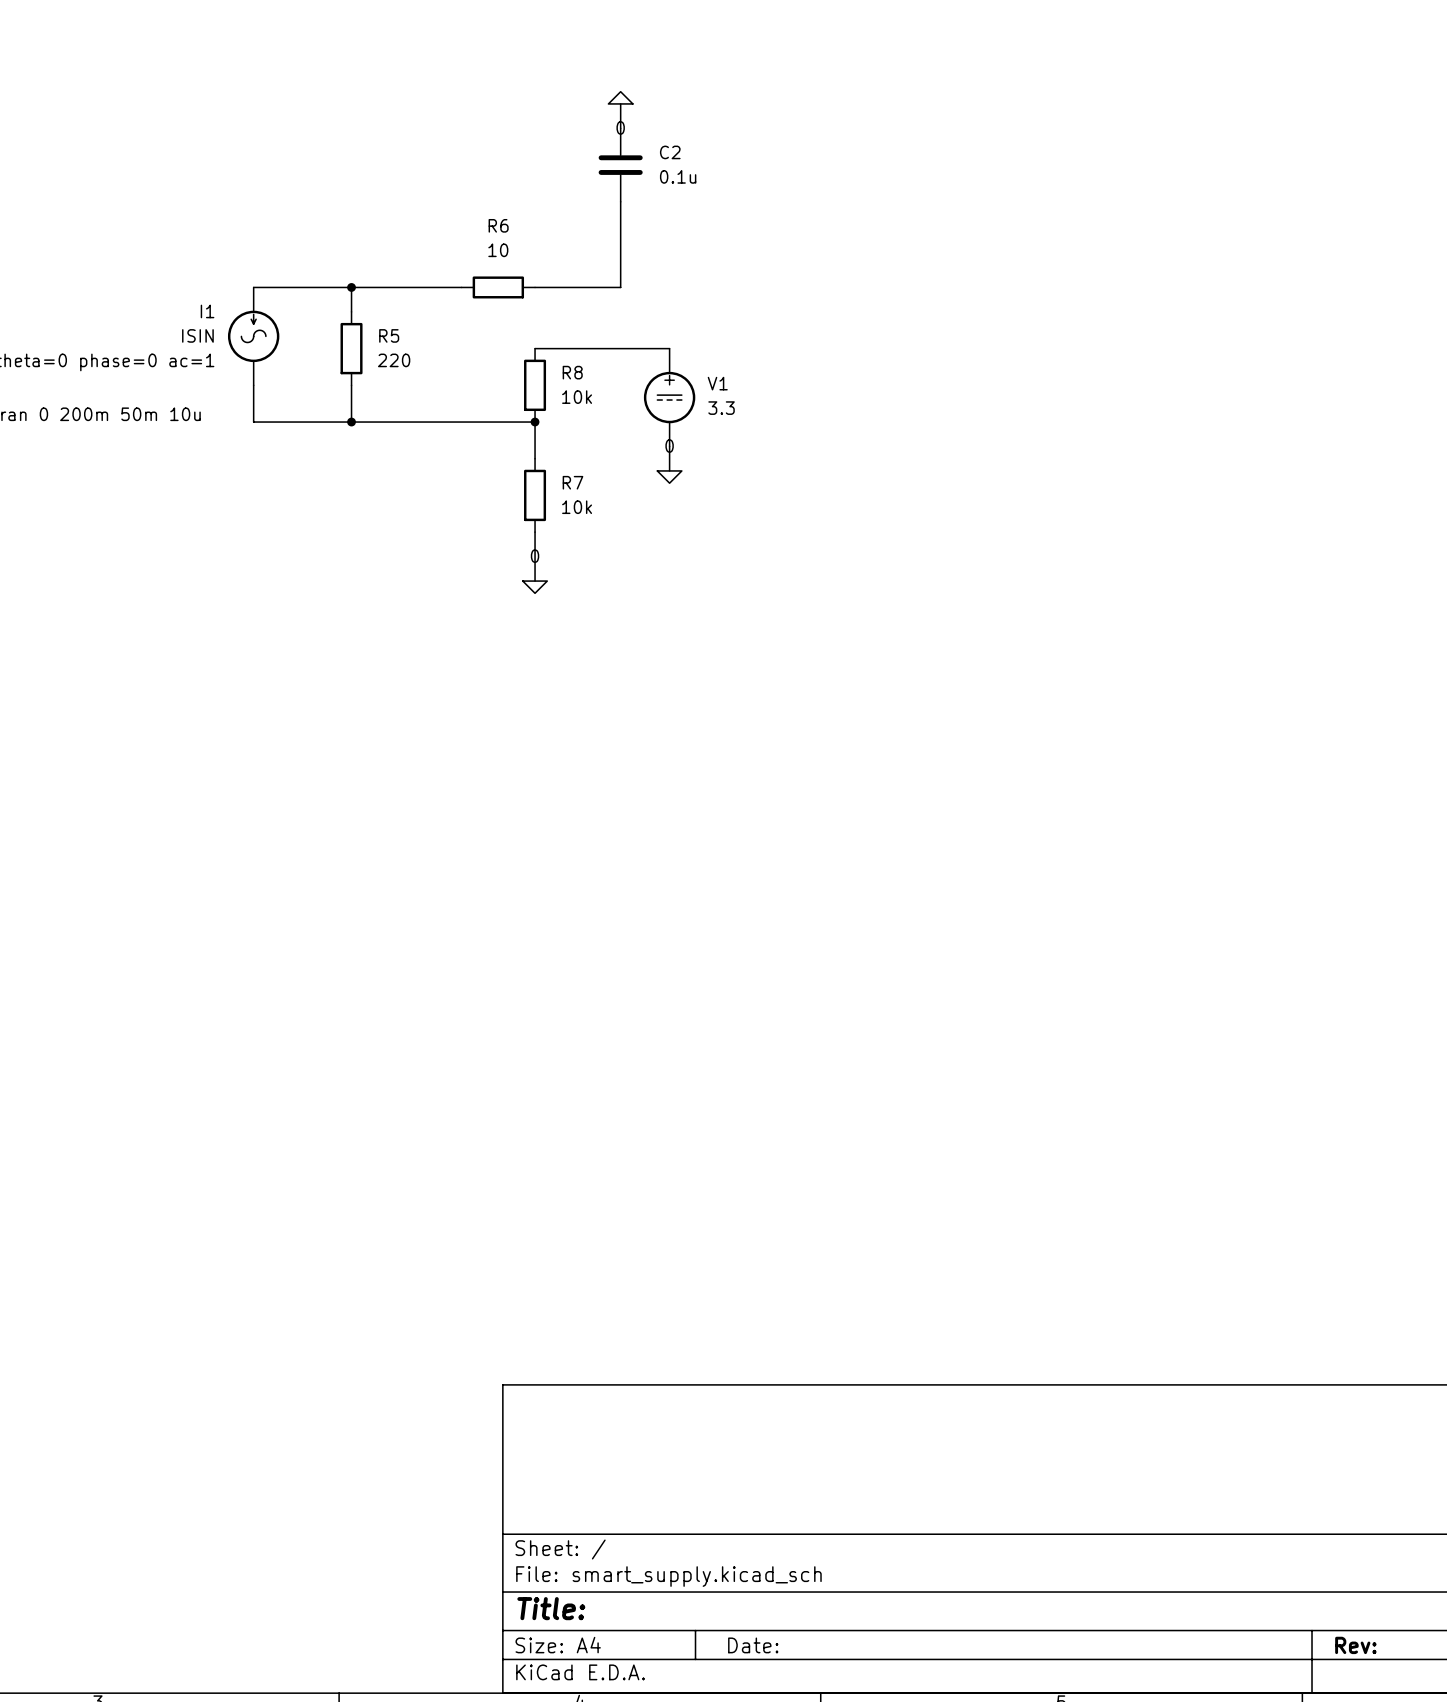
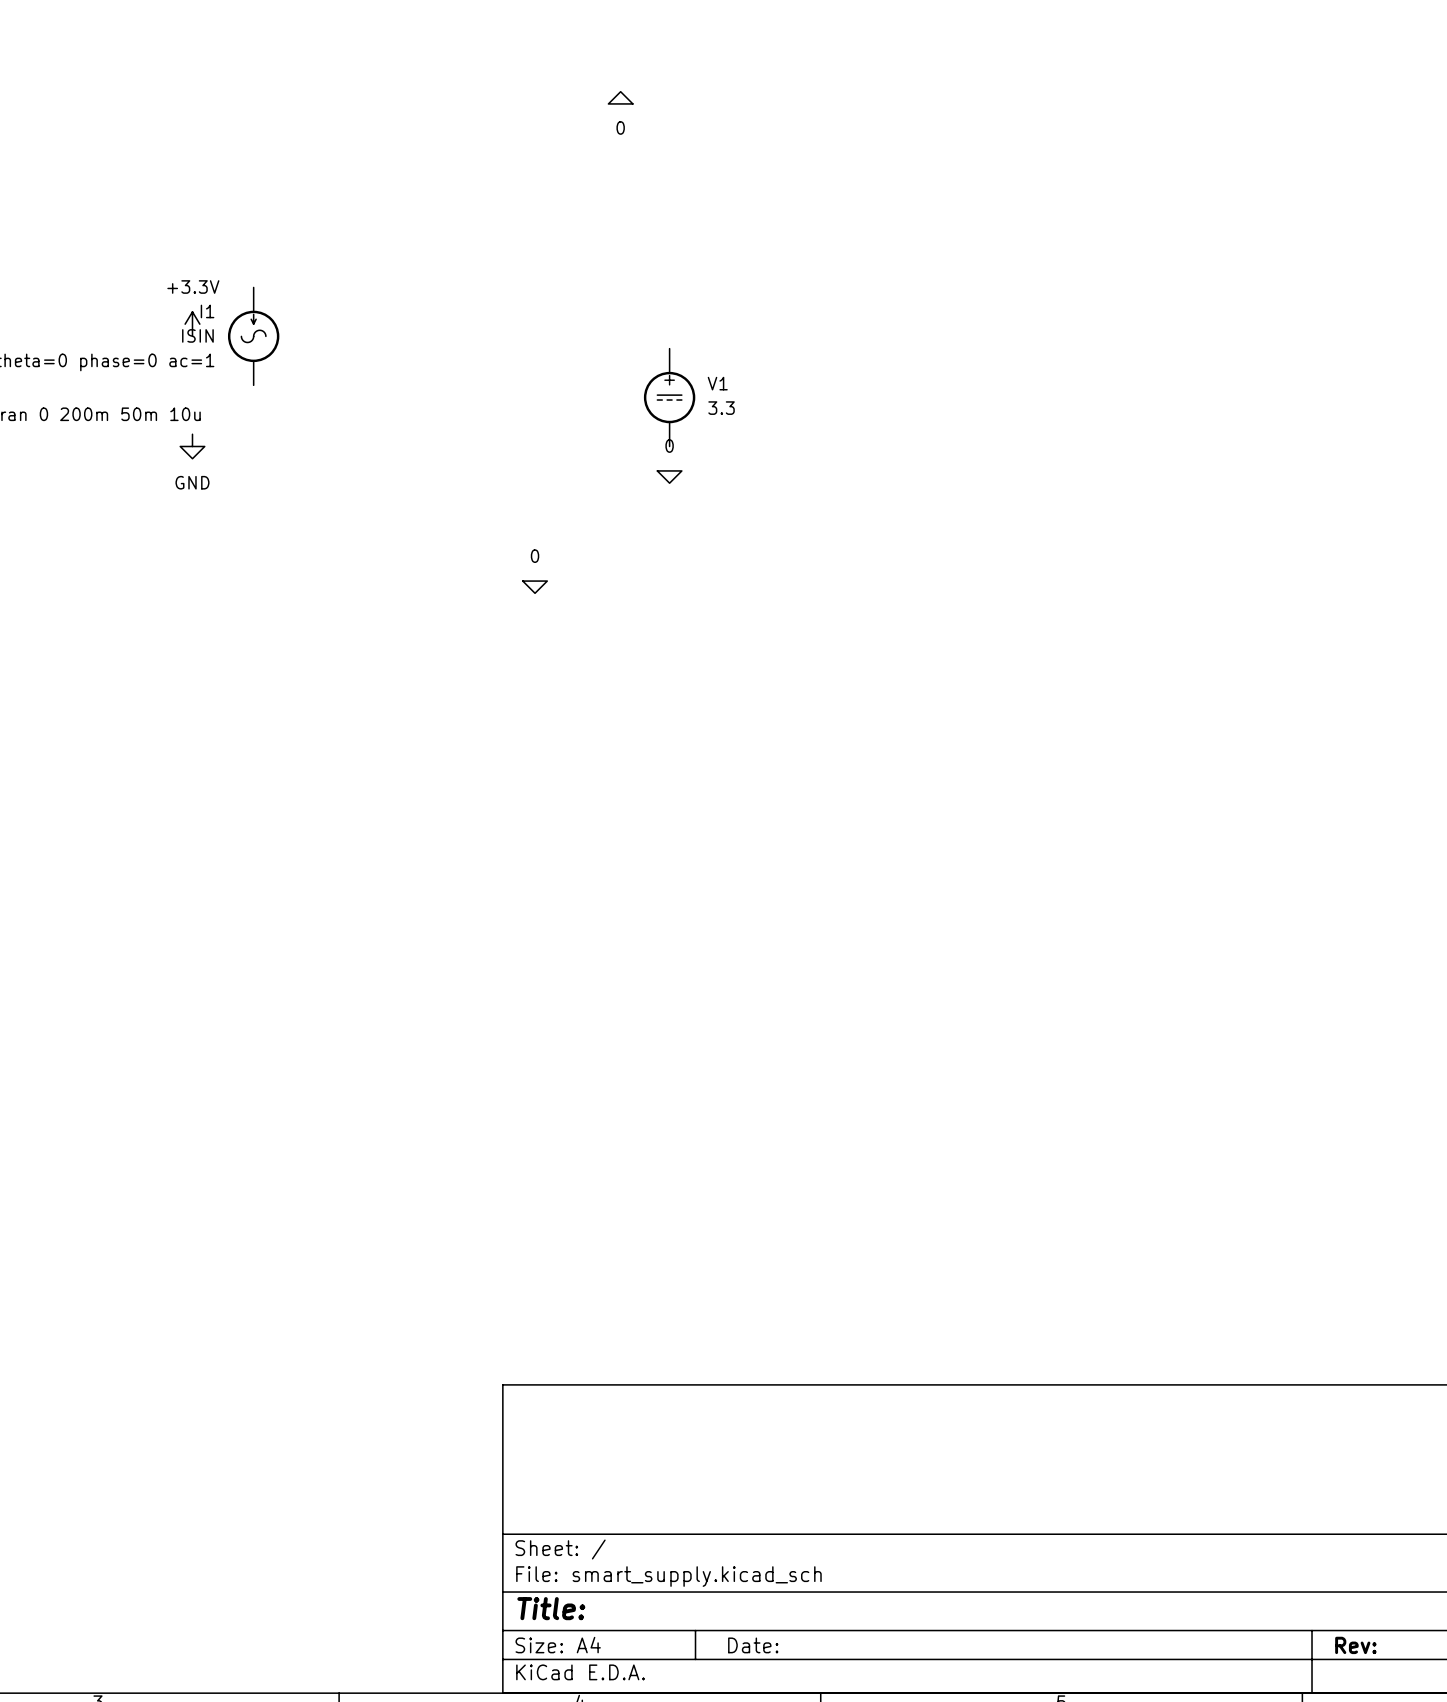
wire: (620, 103) (620, 128) -> none
C2: 0.1u (620, 165) -> none
wire: (620, 201) (620, 287) (535, 287) -> none
wire: (253, 287) (461, 287) -> none
wire: (351, 287) (351, 311) -> none
junction: (351, 287) -> none
R6: 10 (498, 287) -> none
power symbol: none -> +3.3V (192, 324)
R5: 220 (351, 348) -> none
wire: (535, 348) (669, 348) -> none
wire: (253, 385) (253, 422) (535, 422) (535, 458) -> none
wire: (351, 385) (351, 422) -> none
R8: 10k (535, 385) -> none
junction: (351, 422) -> none
junction: (535, 422) -> none
power symbol: none -> GND (192, 446)
wire: (669, 446) (669, 470) -> none
R7: 10k (535, 495) -> none
wire: (535, 532) (535, 581) -> none

